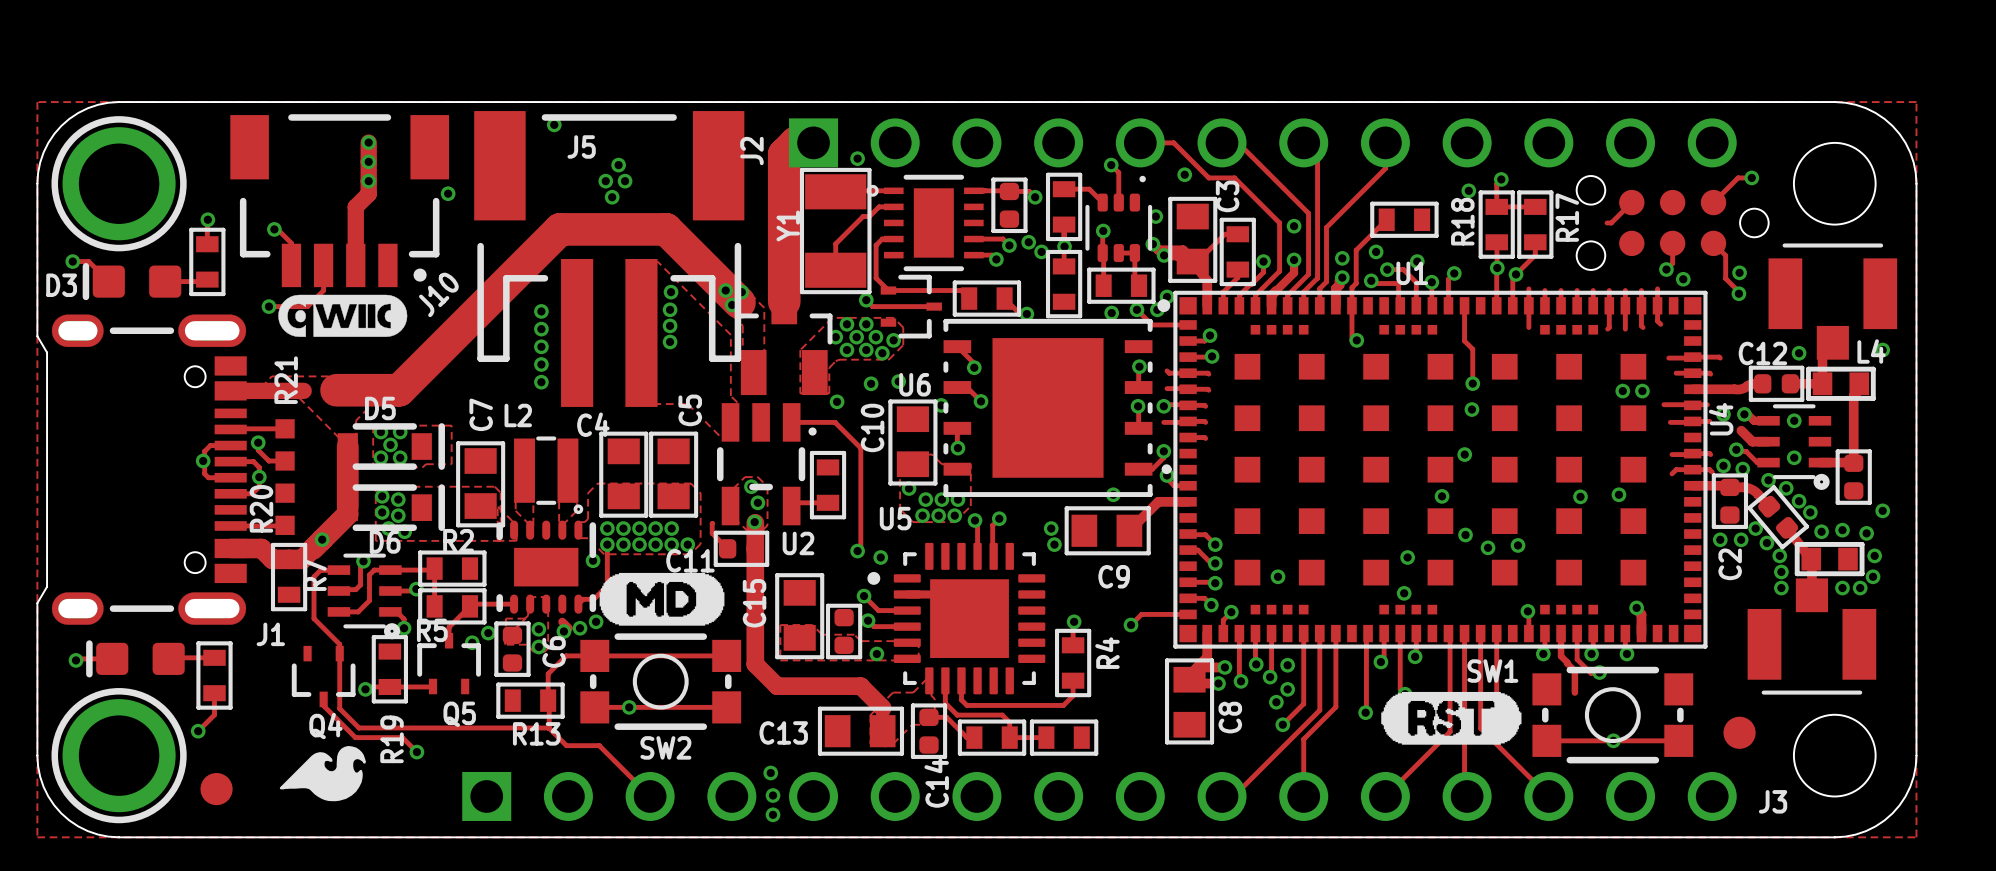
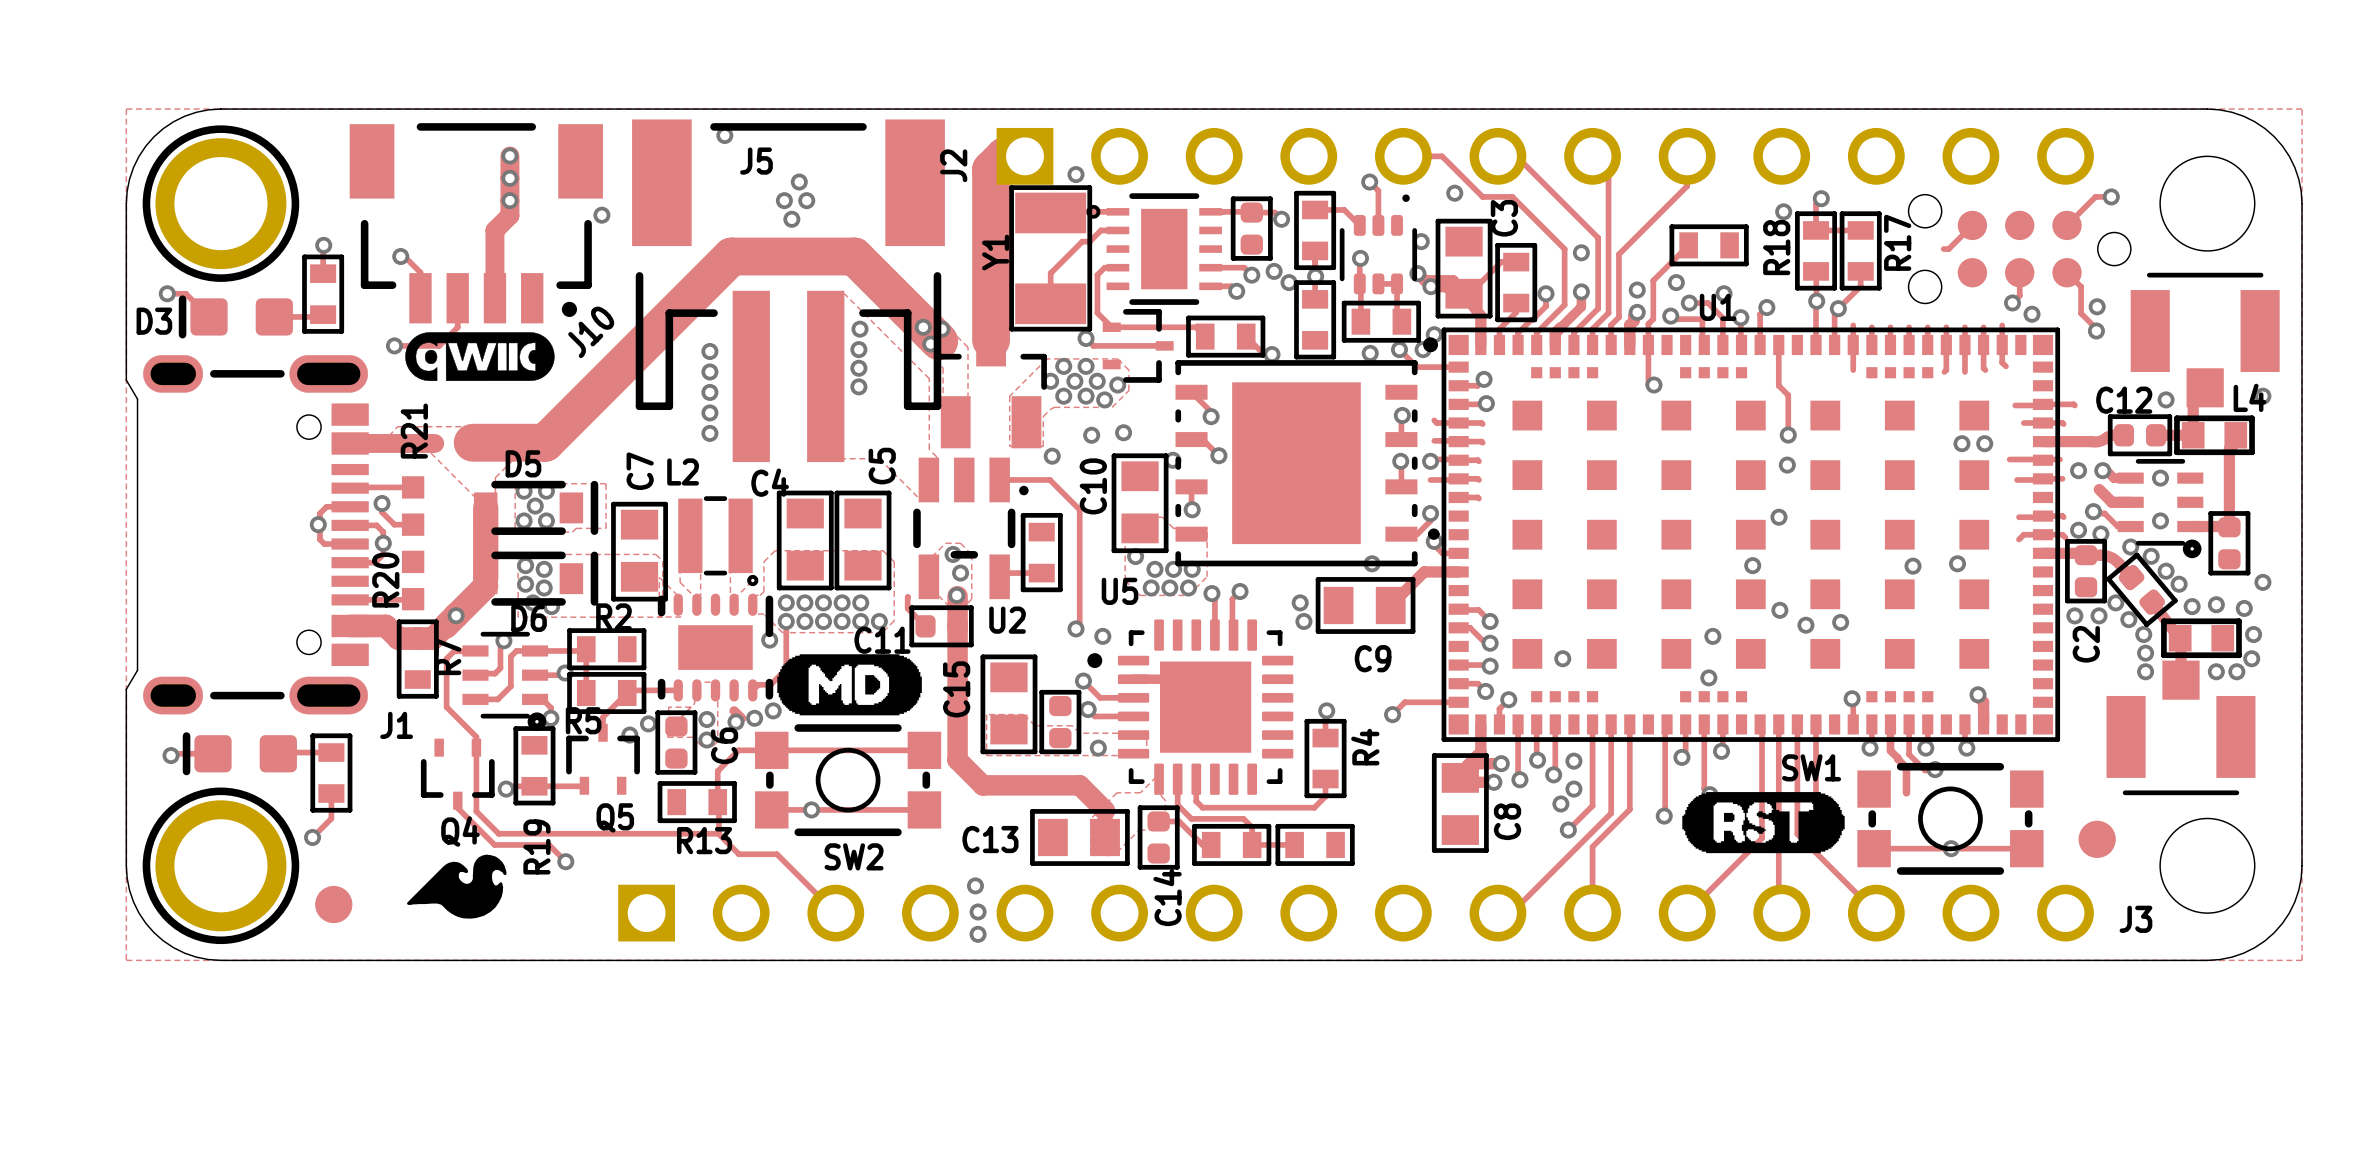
U6 name: U6 (915, 384) -> none
U4 name: U4 (1721, 419) -> none

